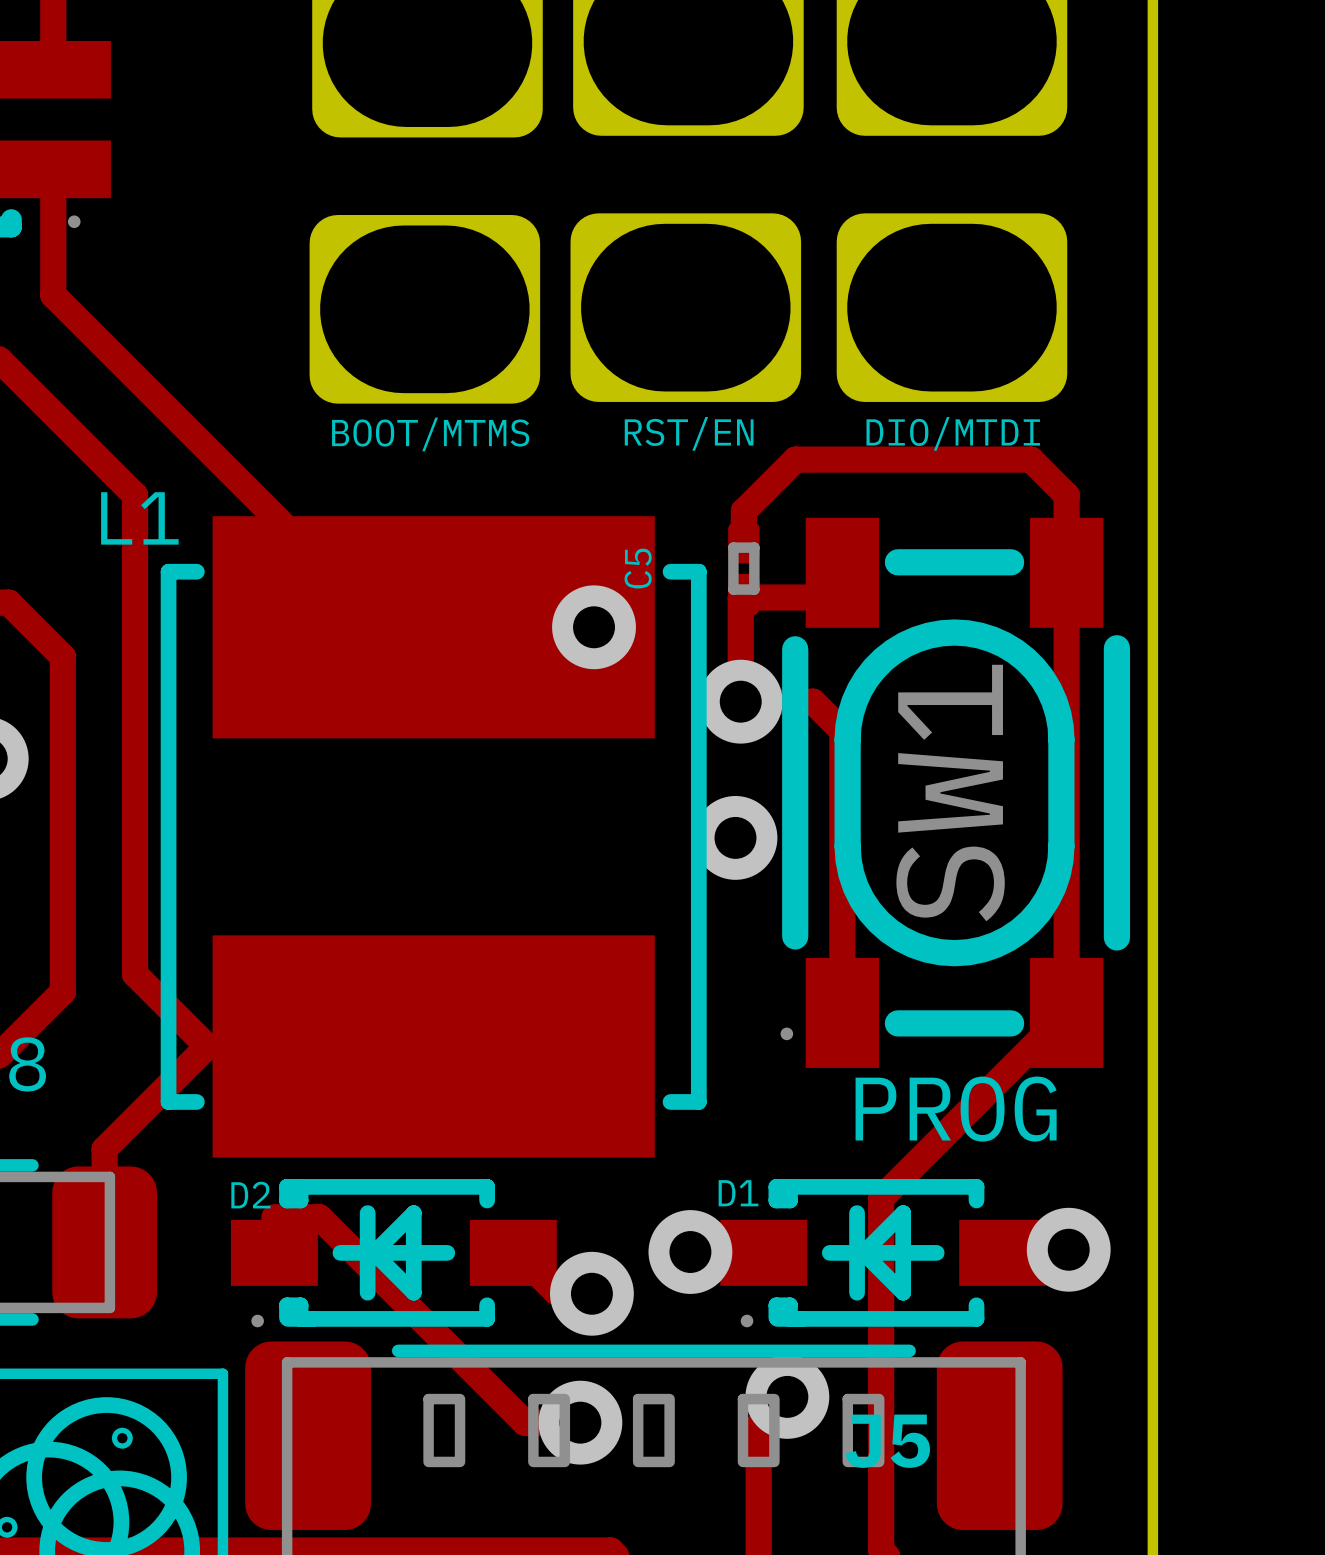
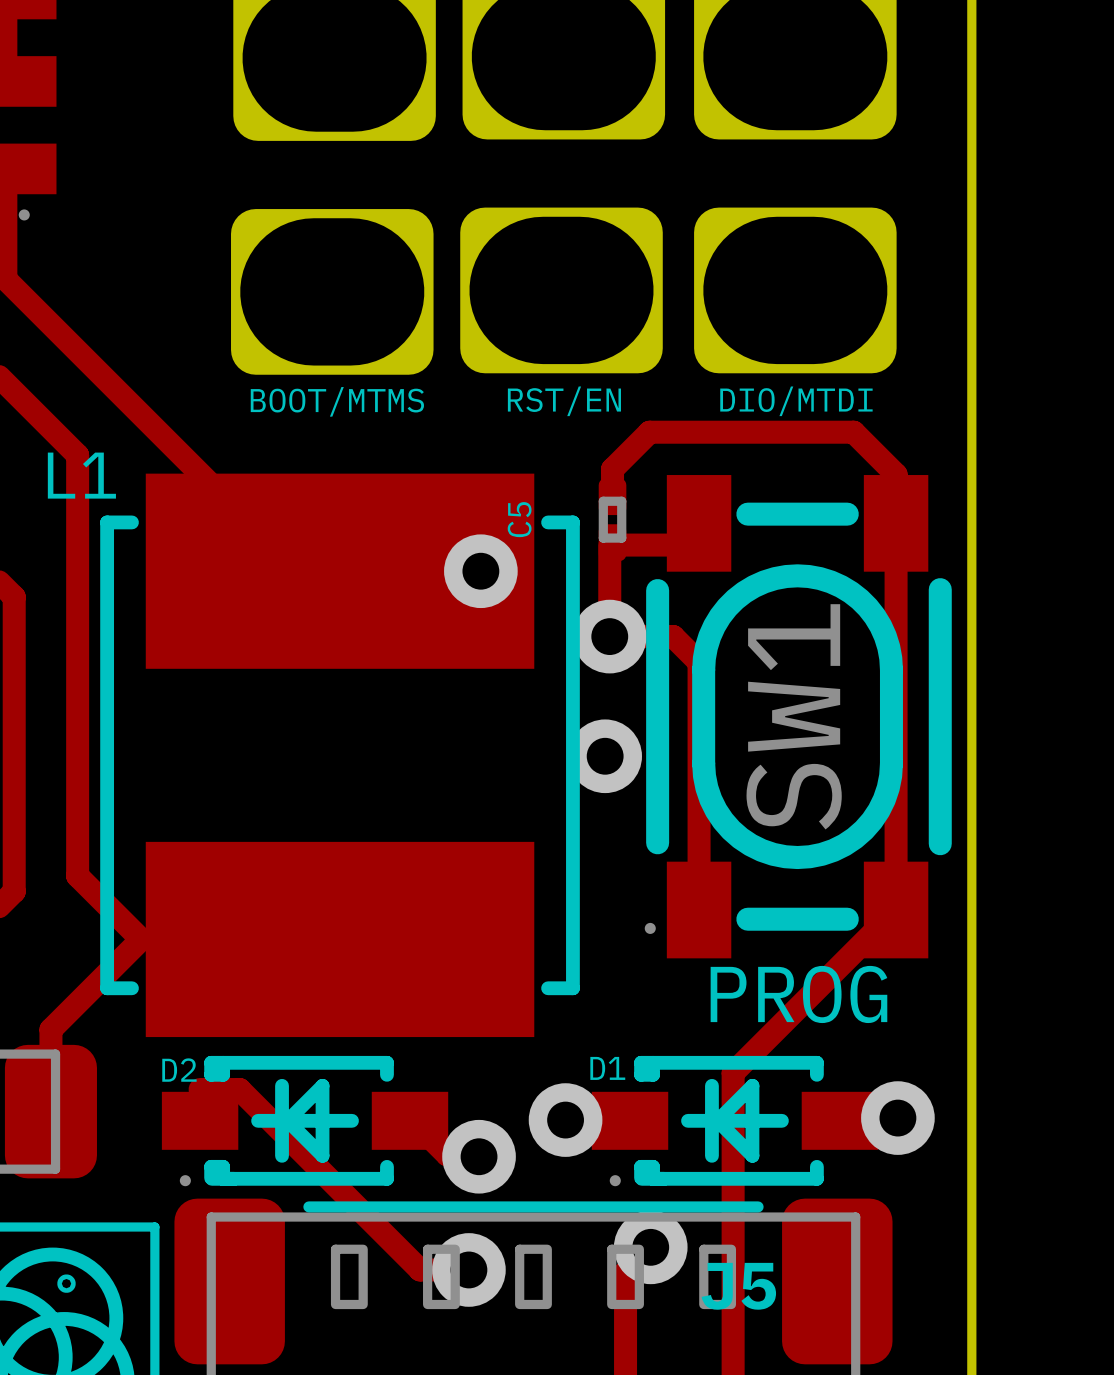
track: (786, 469) (795, 459) (1031, 459) (1066, 495) (1066, 517) -> (649, 432) (853, 432) (896, 474)

